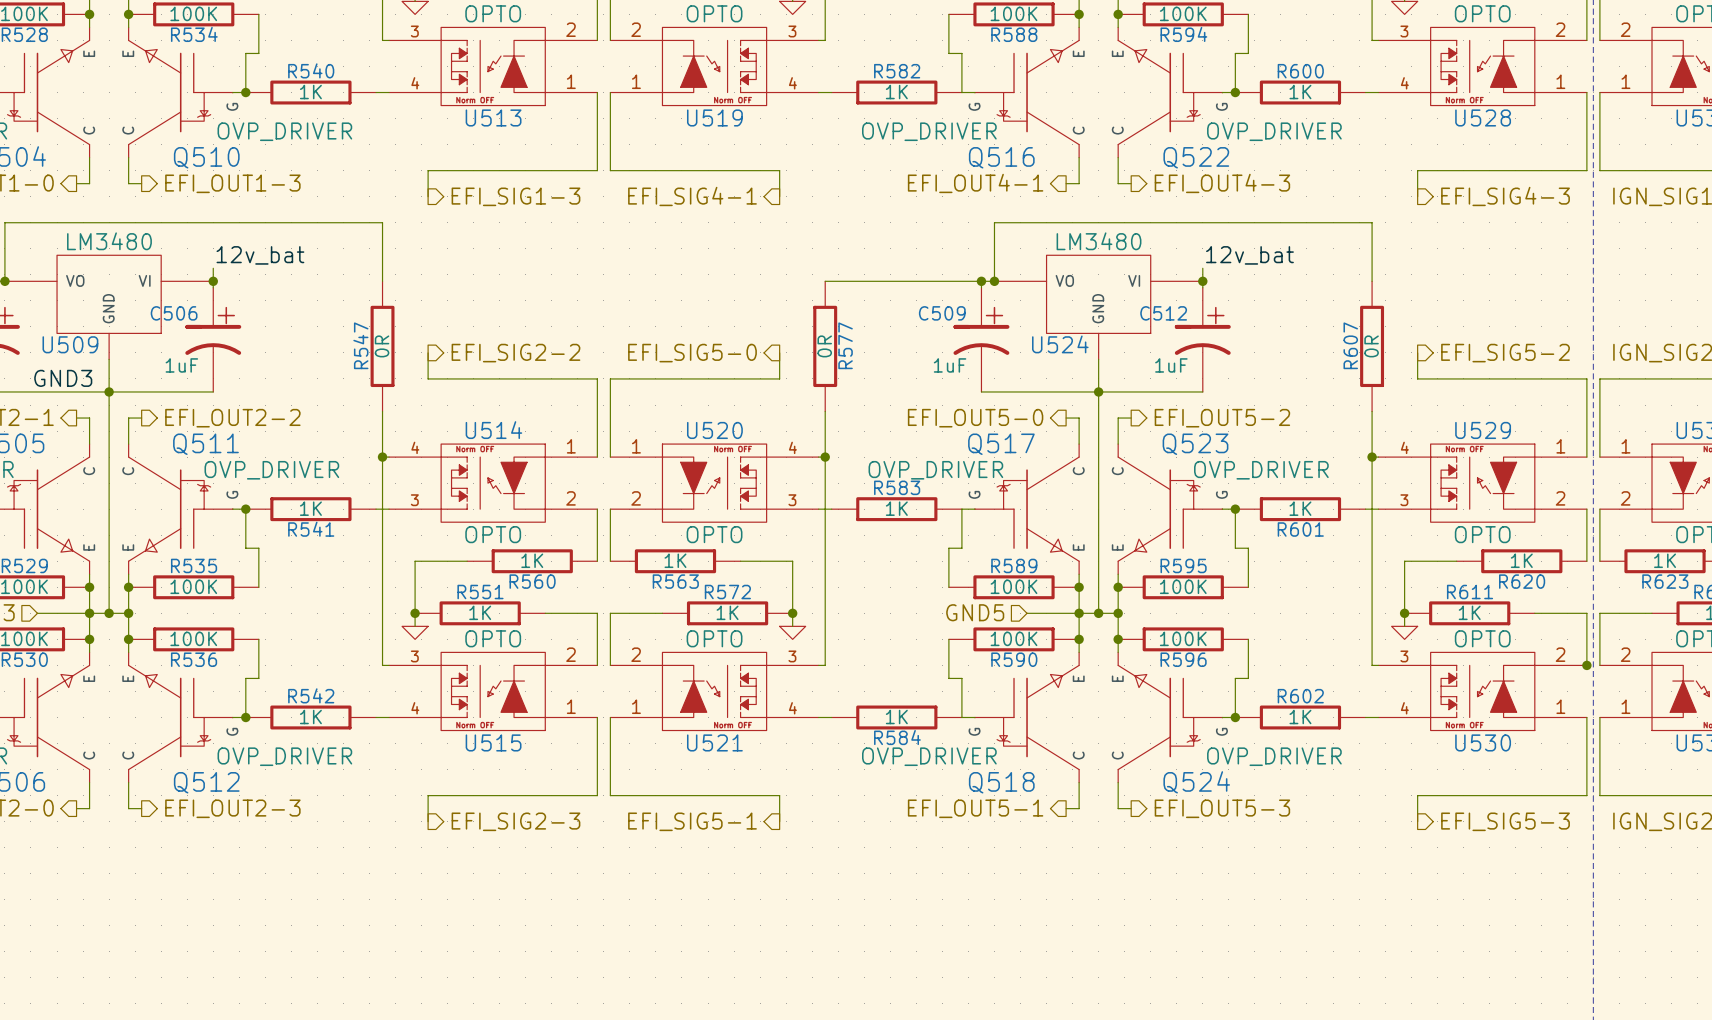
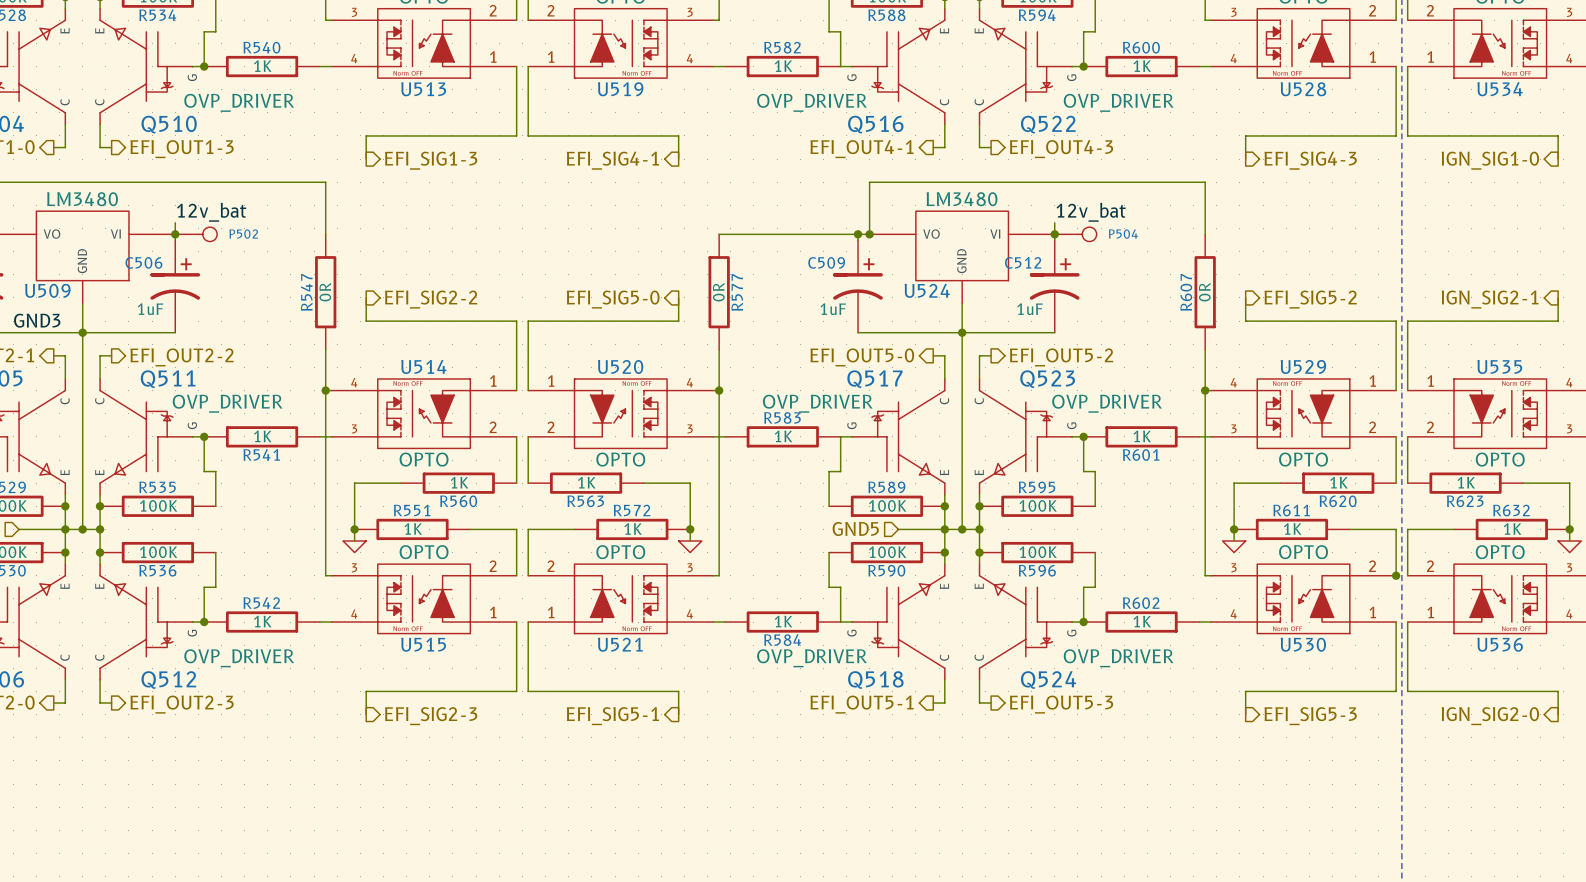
P502: none -> (196, 234)
P504: none -> (1075, 234)

